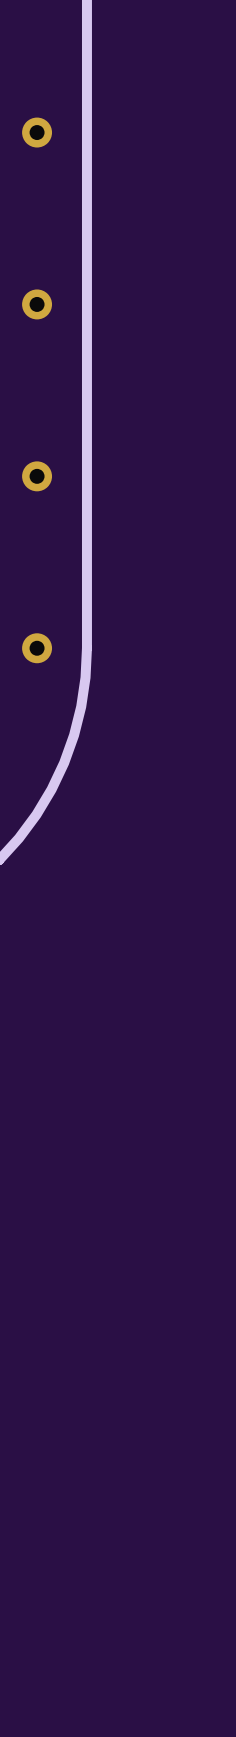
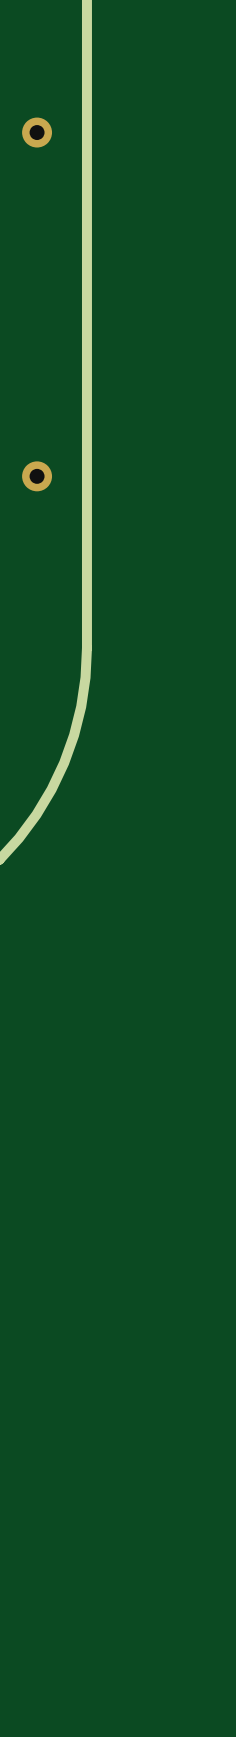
via: (37, 304) -> none
via: (37, 648) -> none

